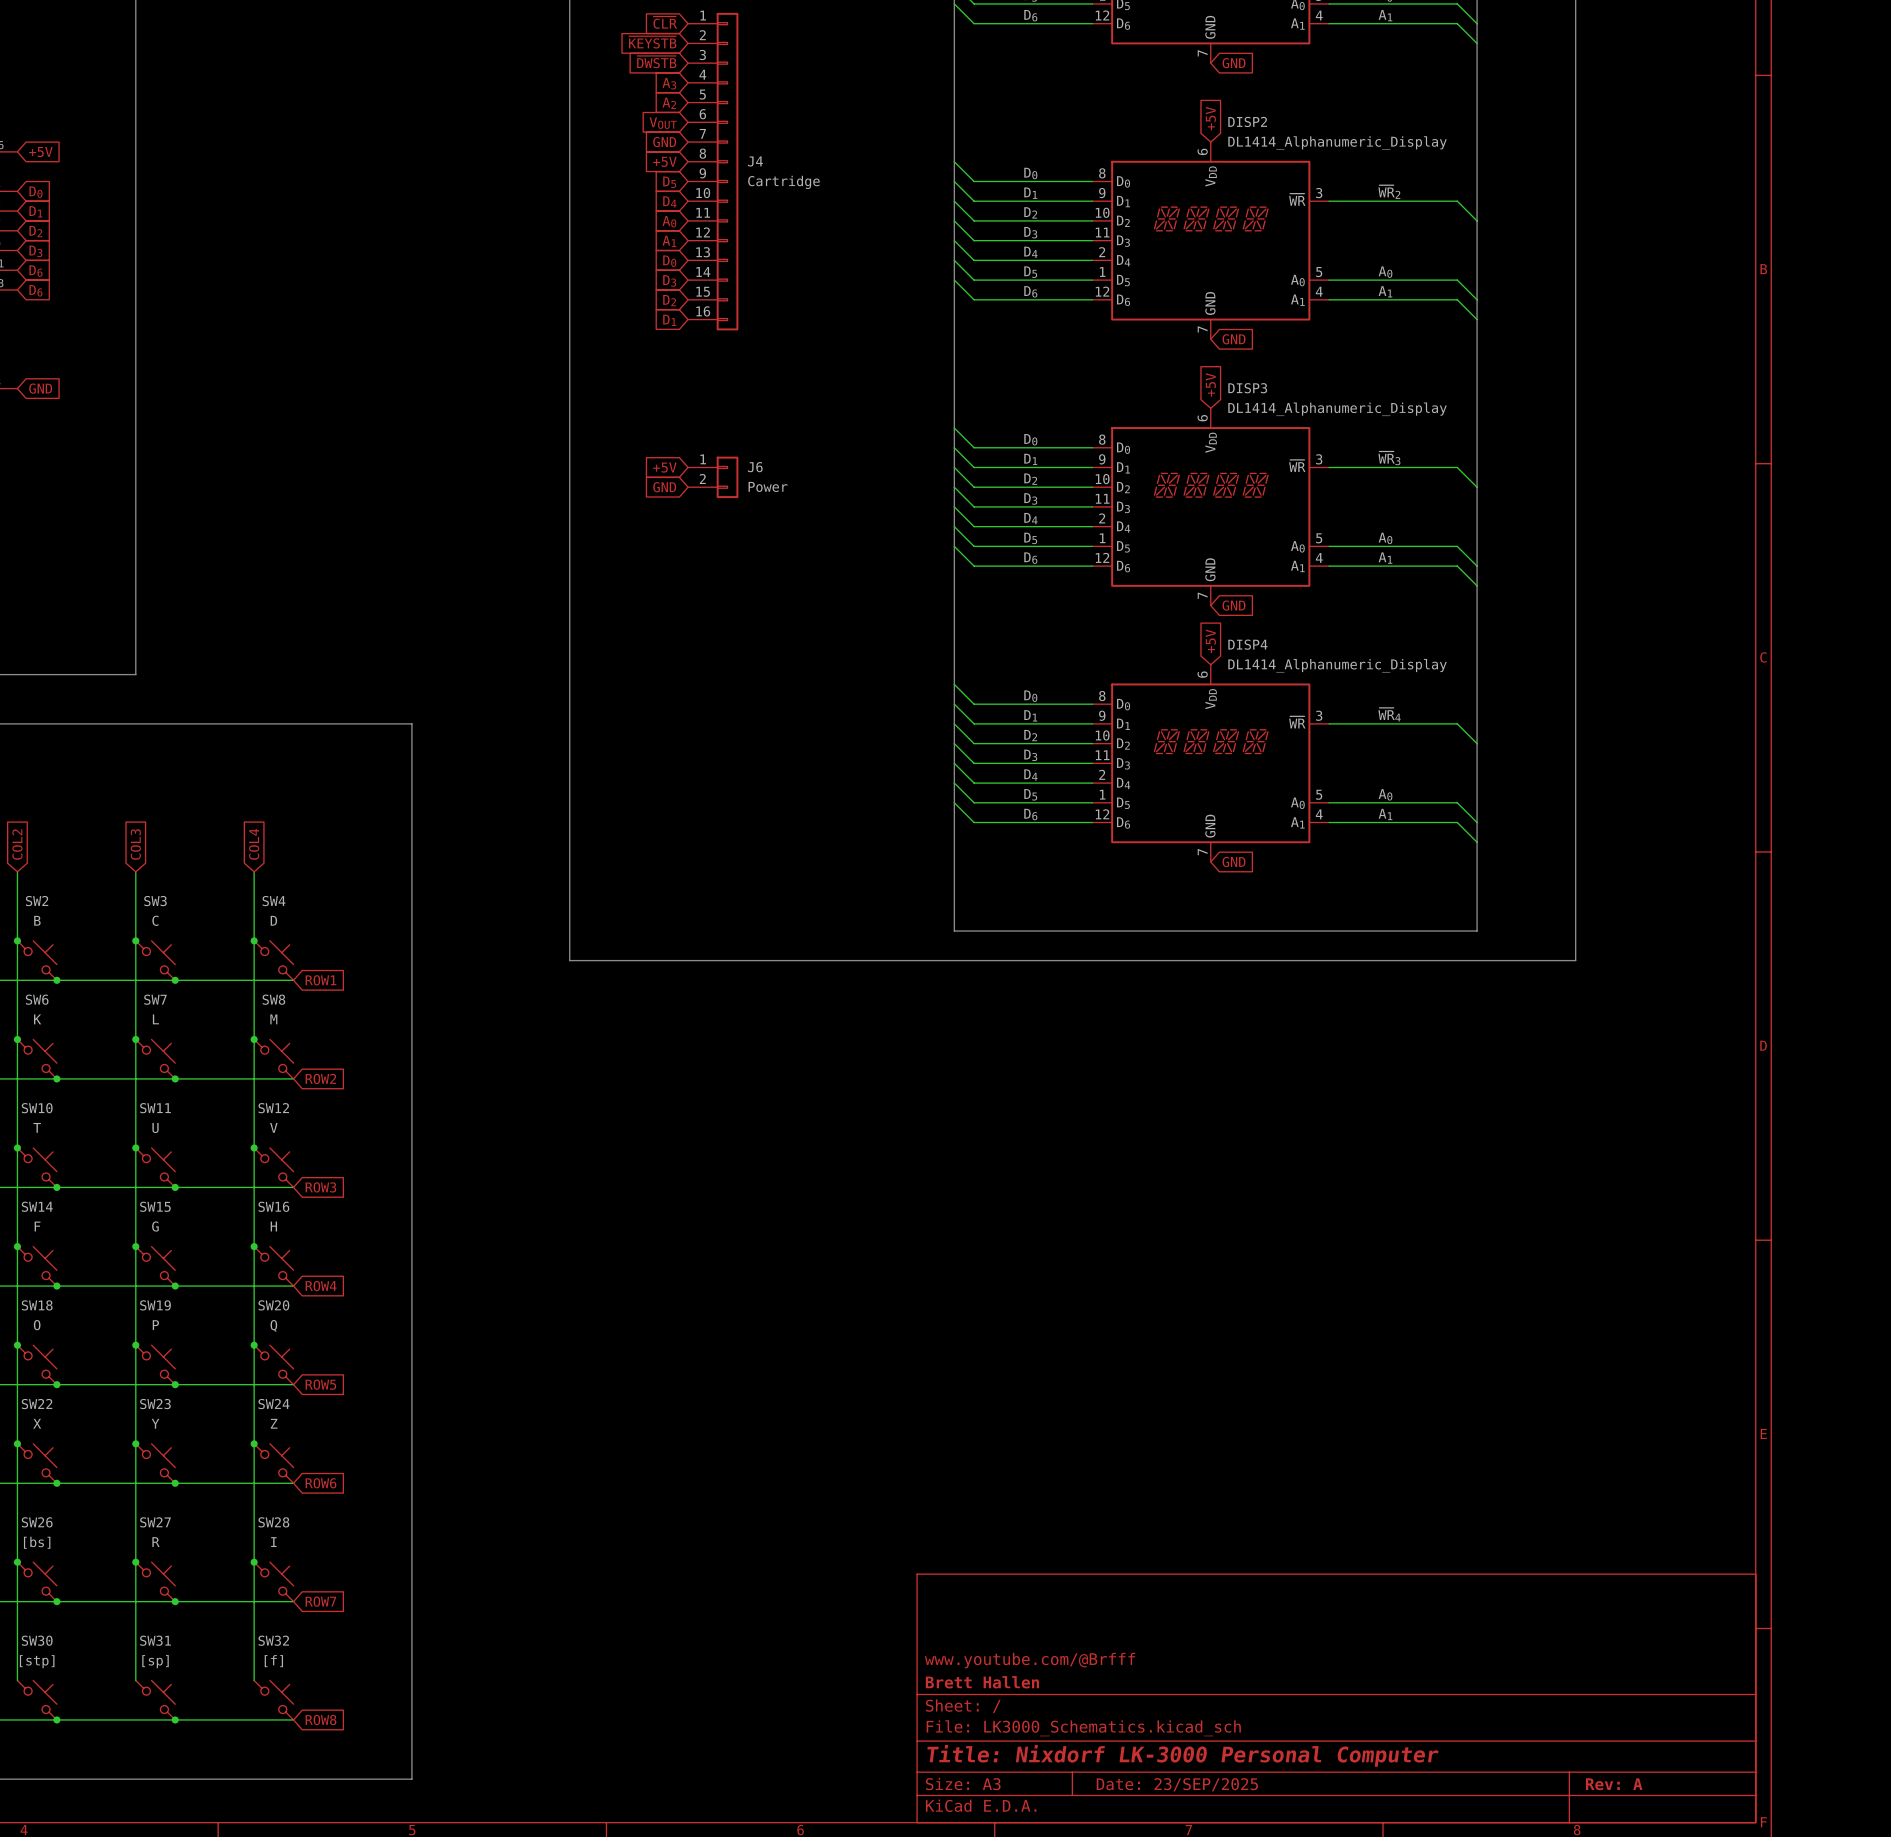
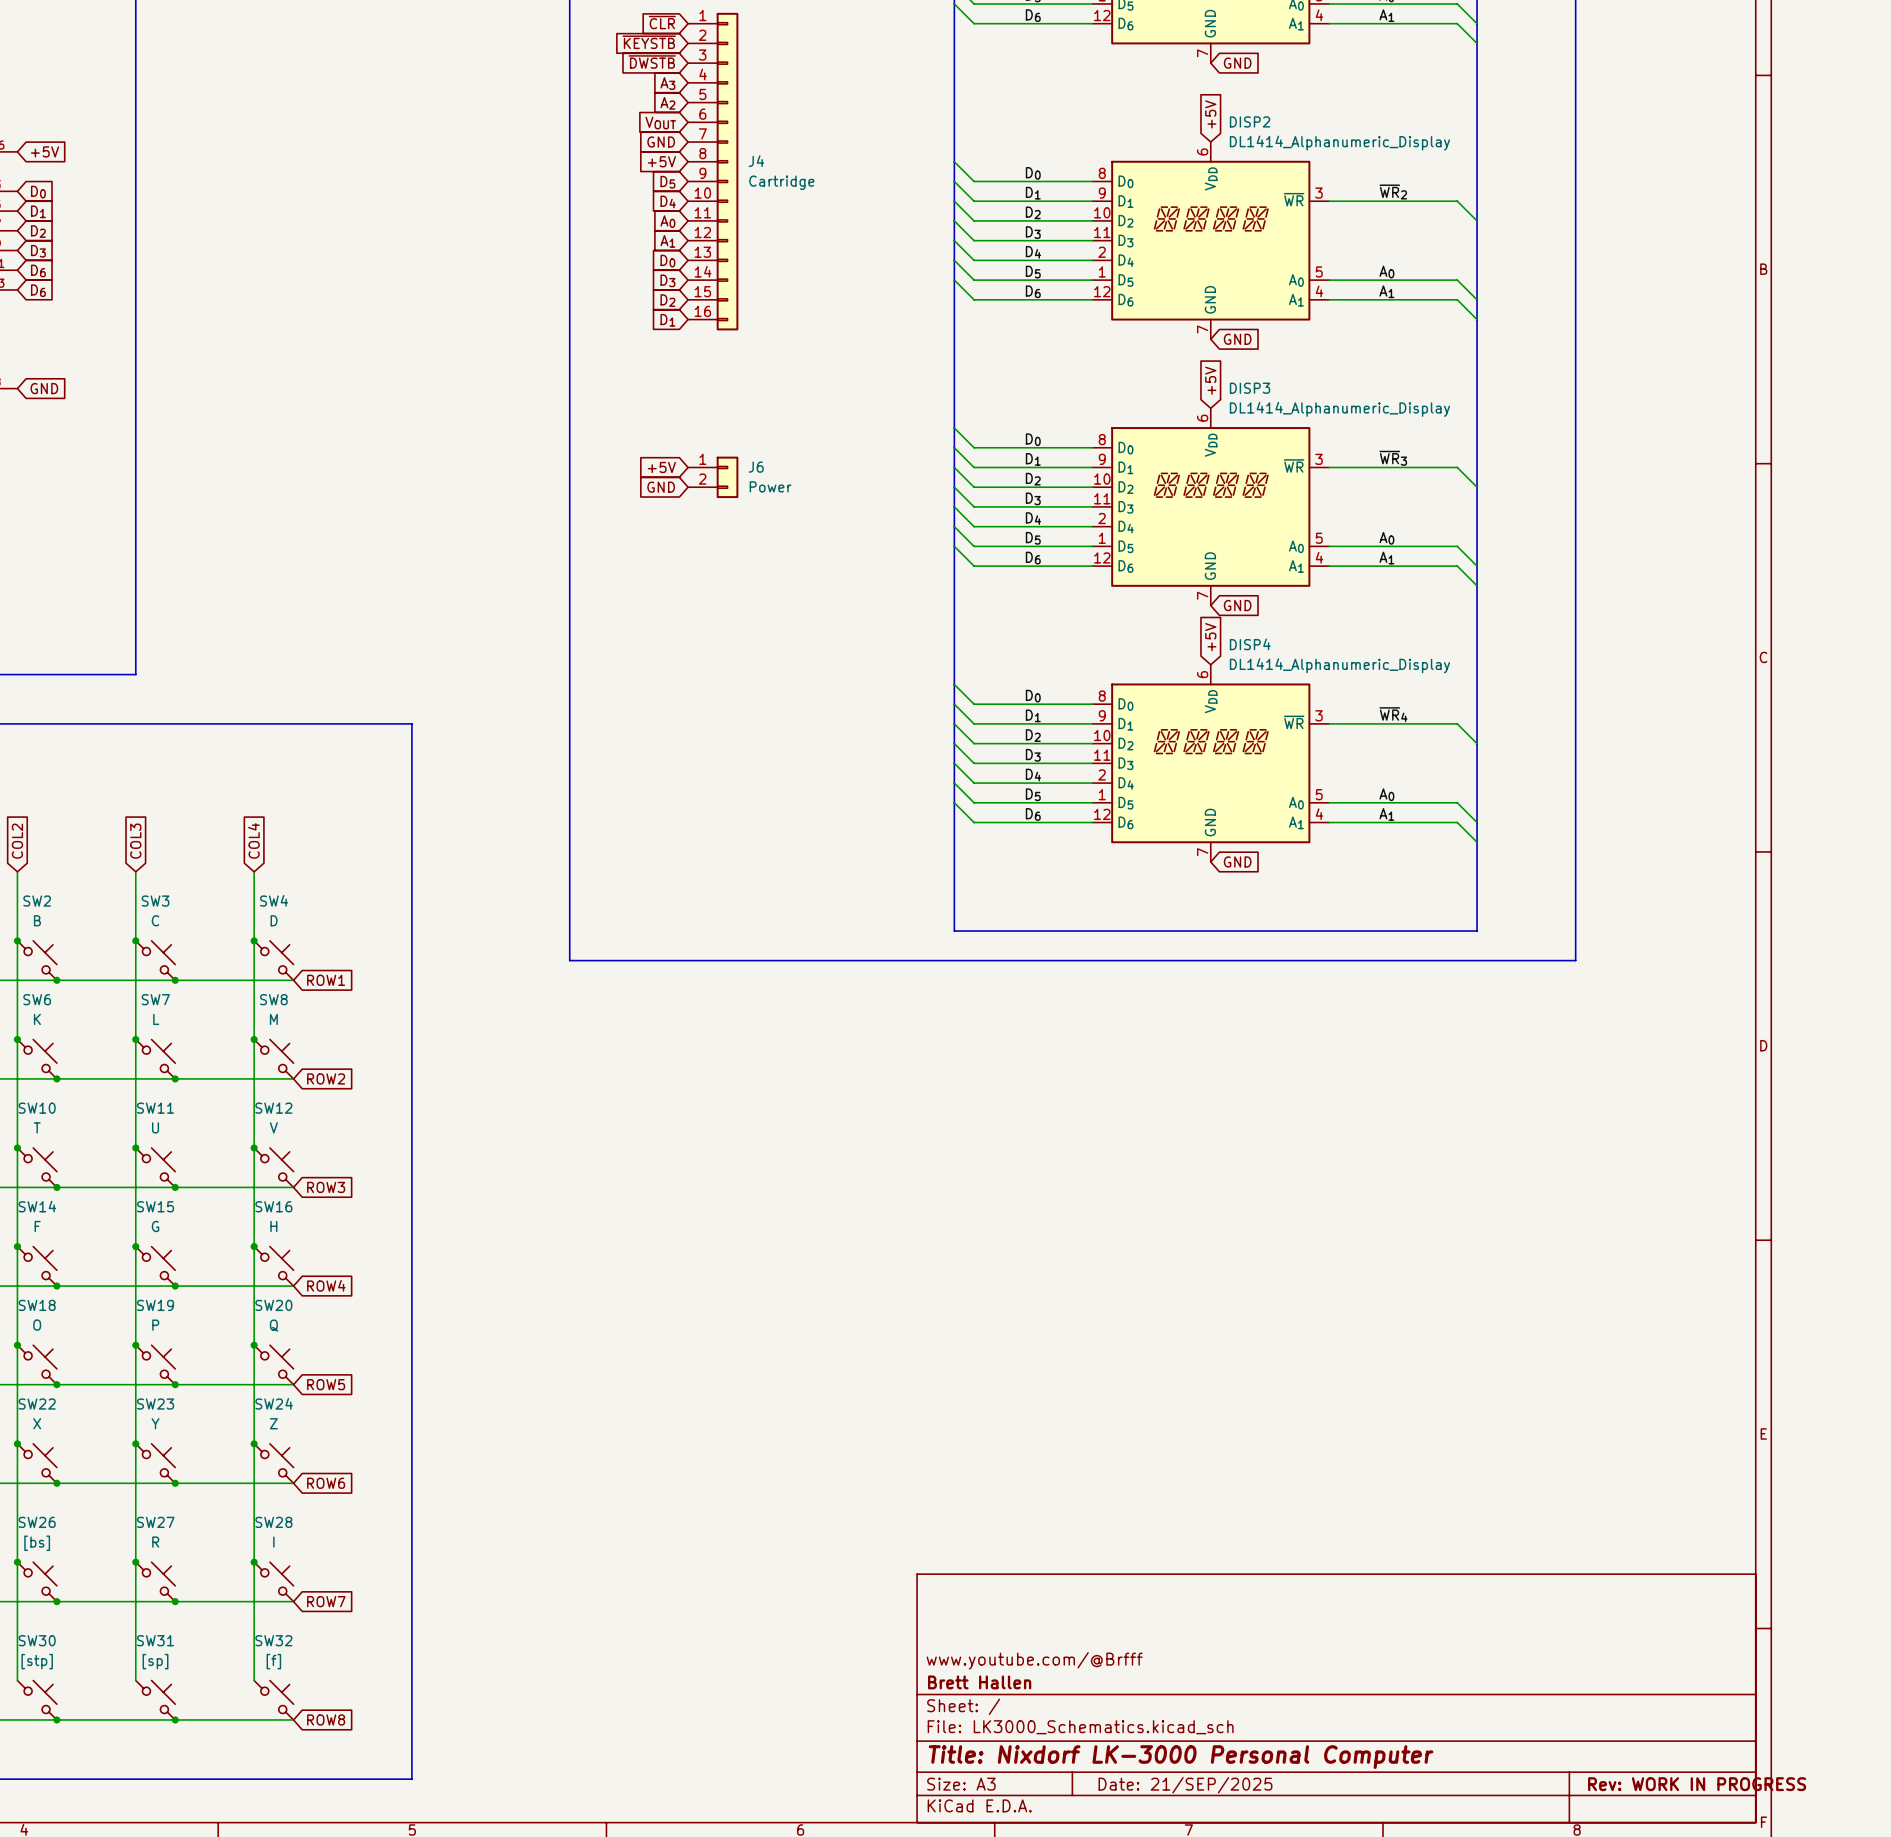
title block: Date: 23/SEP/2025 (1177, 1784) -> Date: 21/SEP/2025 (1185, 1785)
title block: Rev: A (1614, 1784) -> Rev: WORK IN PROGRESS (1697, 1784)

